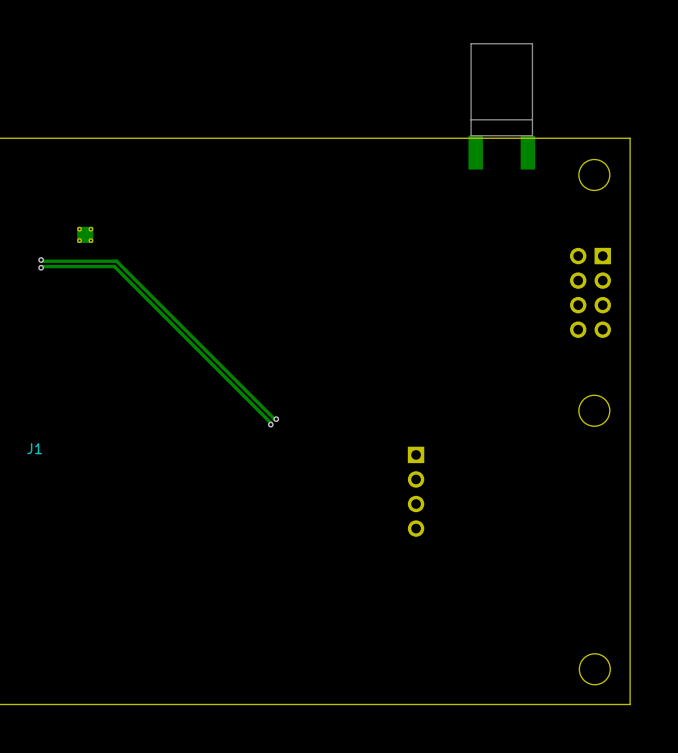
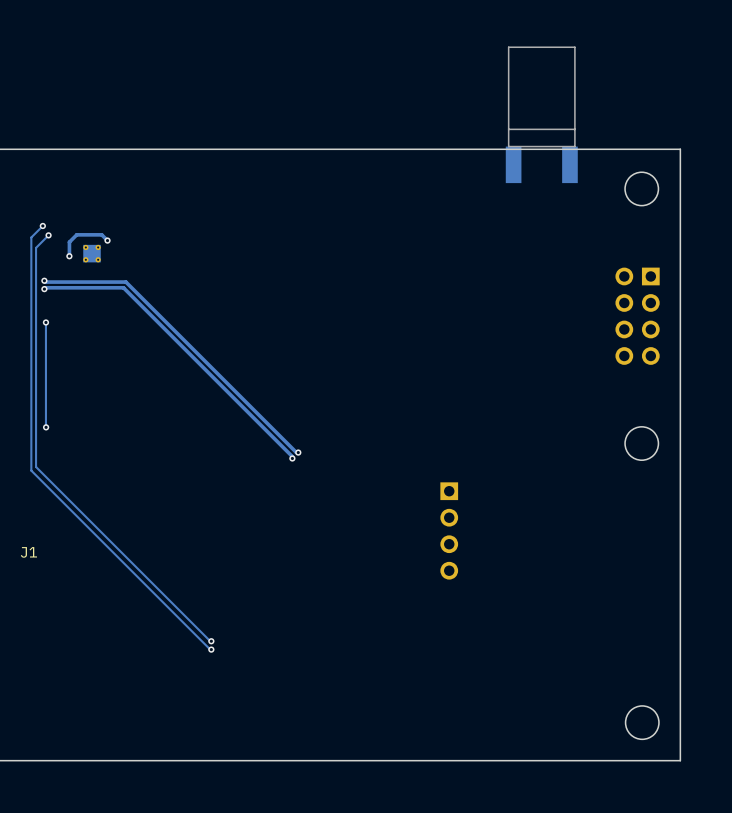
track: none -> (42, 225) (31, 237) (31, 470) (211, 649)
via: none -> (42, 225)
track: none -> (48, 235) (36, 247) (36, 467) (211, 641)
via: none -> (48, 235)
track: none -> (107, 240) (101, 234) (76, 234) (69, 242) (69, 256)
via: none -> (107, 240)
via: none -> (69, 256)
track: none -> (45, 322) (45, 427)
via: none -> (45, 322)
via: none -> (46, 427)
J1 name position: J1 (34, 448) -> J1 (28, 552)
via: none -> (211, 641)
via: none -> (211, 649)

